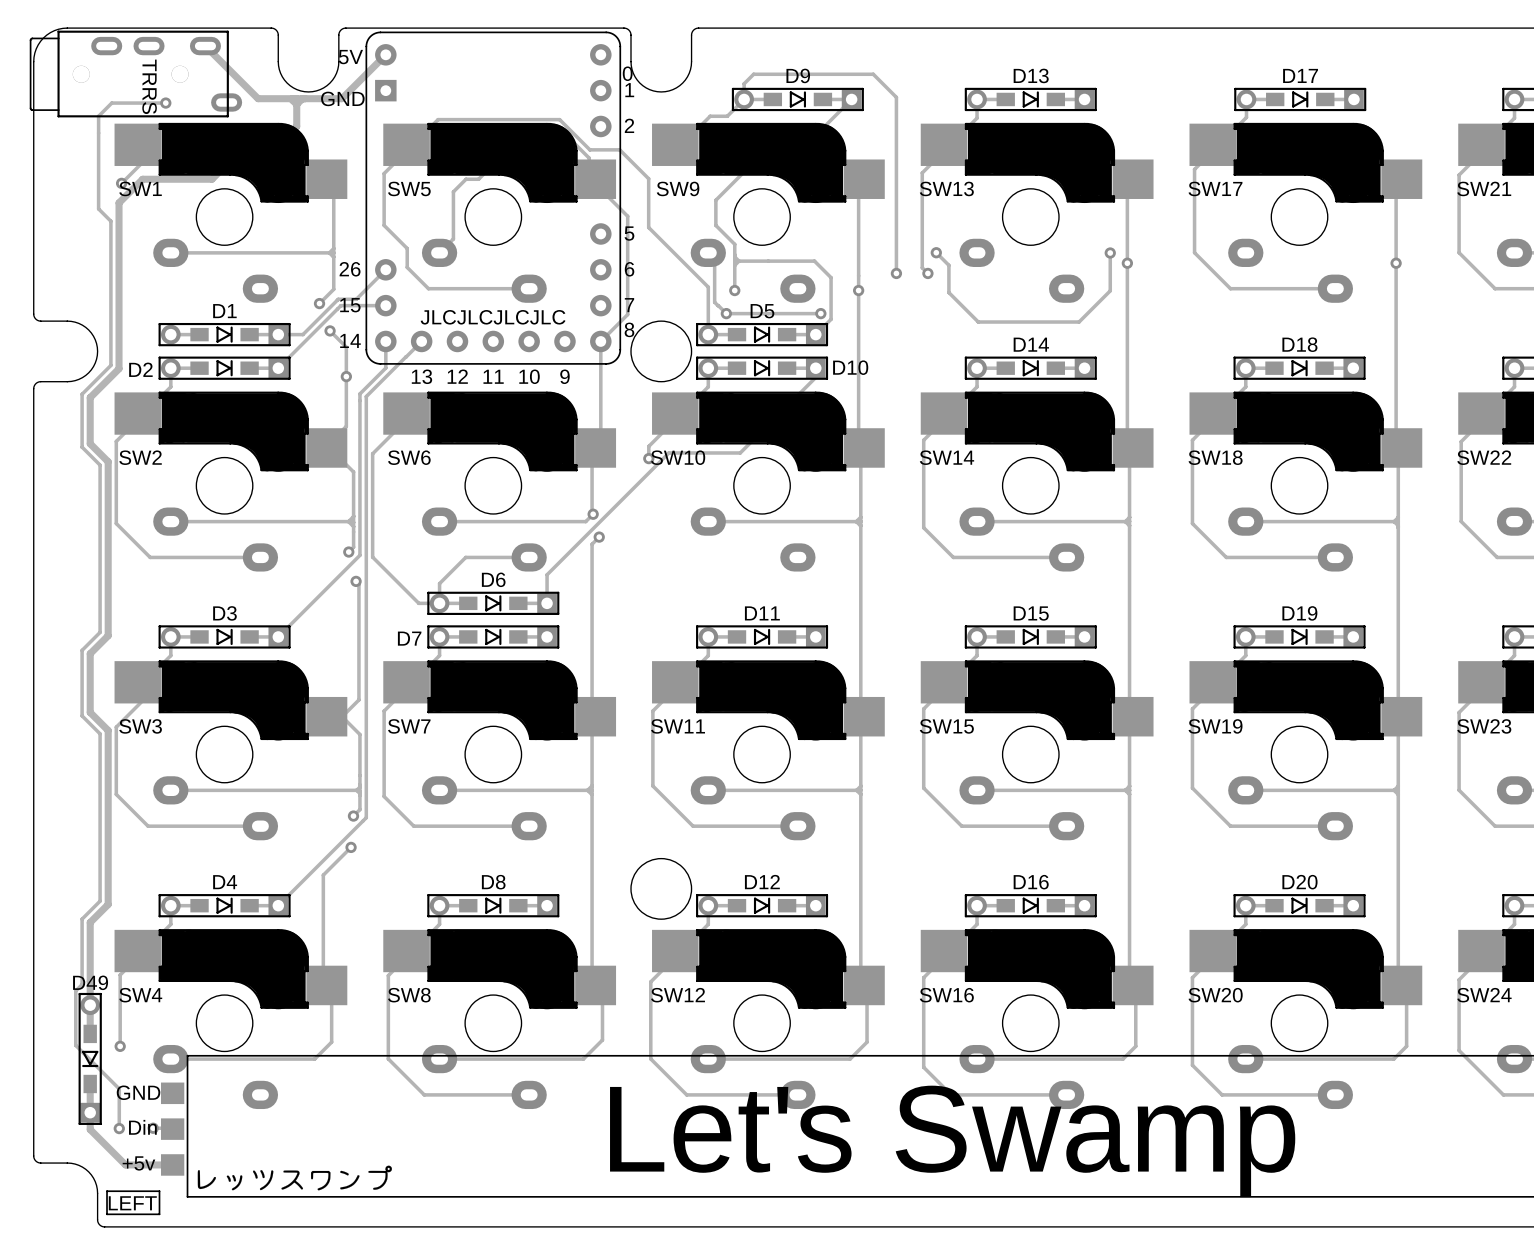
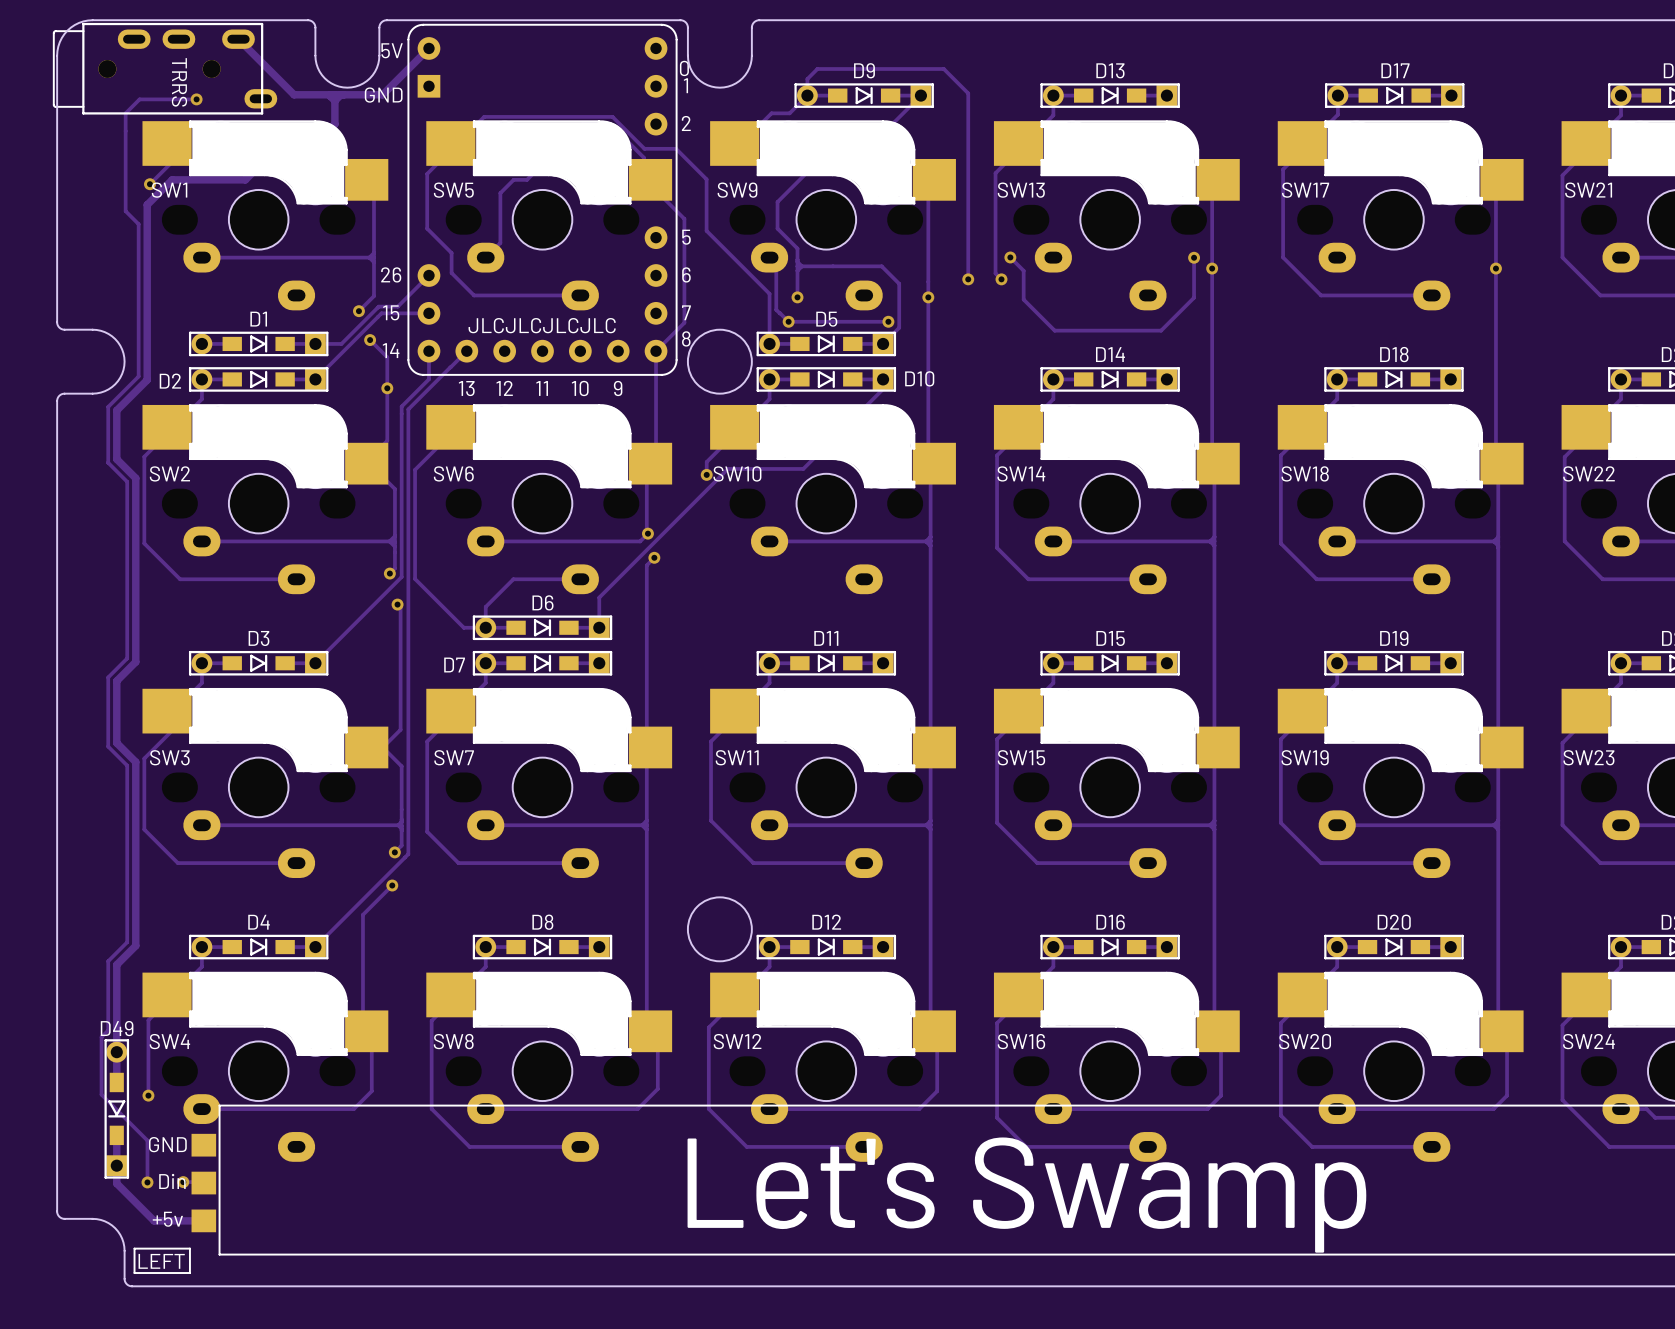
drawing: [197, 1165, 392, 1191] -> none

